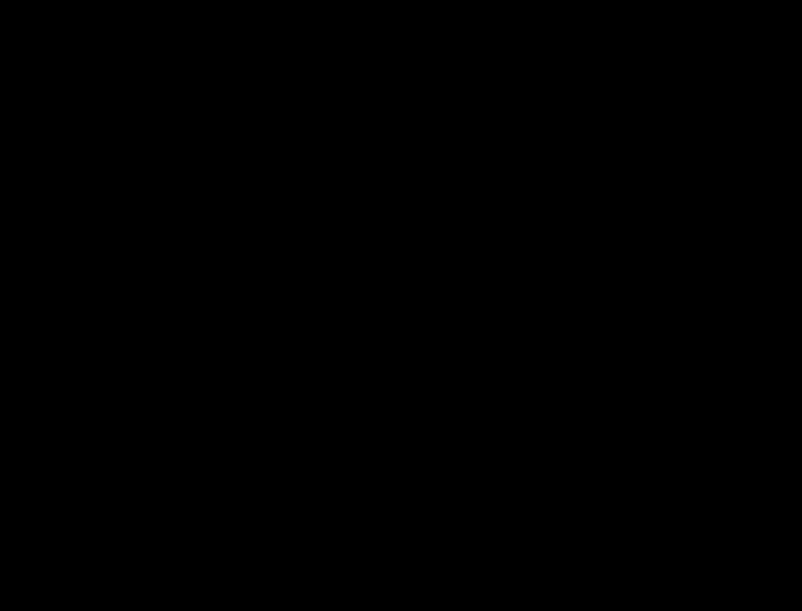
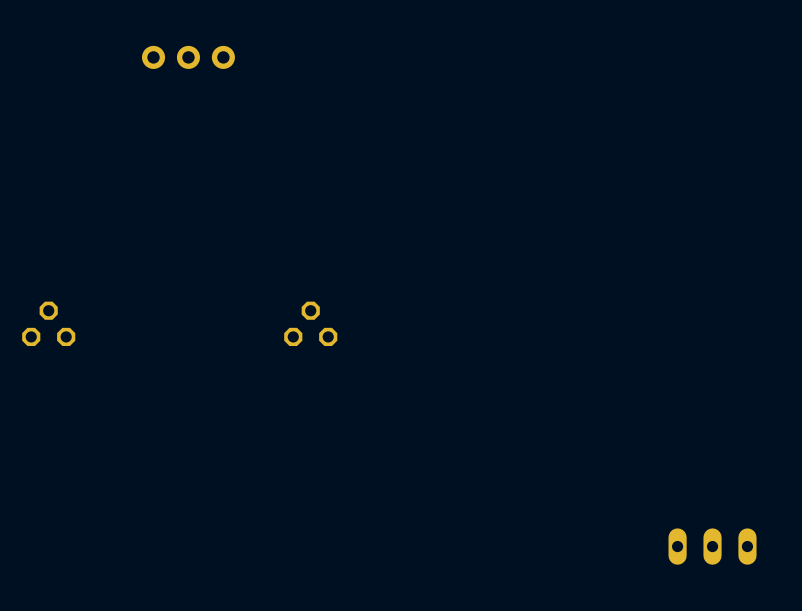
part: none -> (188, 57)
part: none -> (48, 323)
part: none -> (310, 323)
part: none -> (712, 546)

